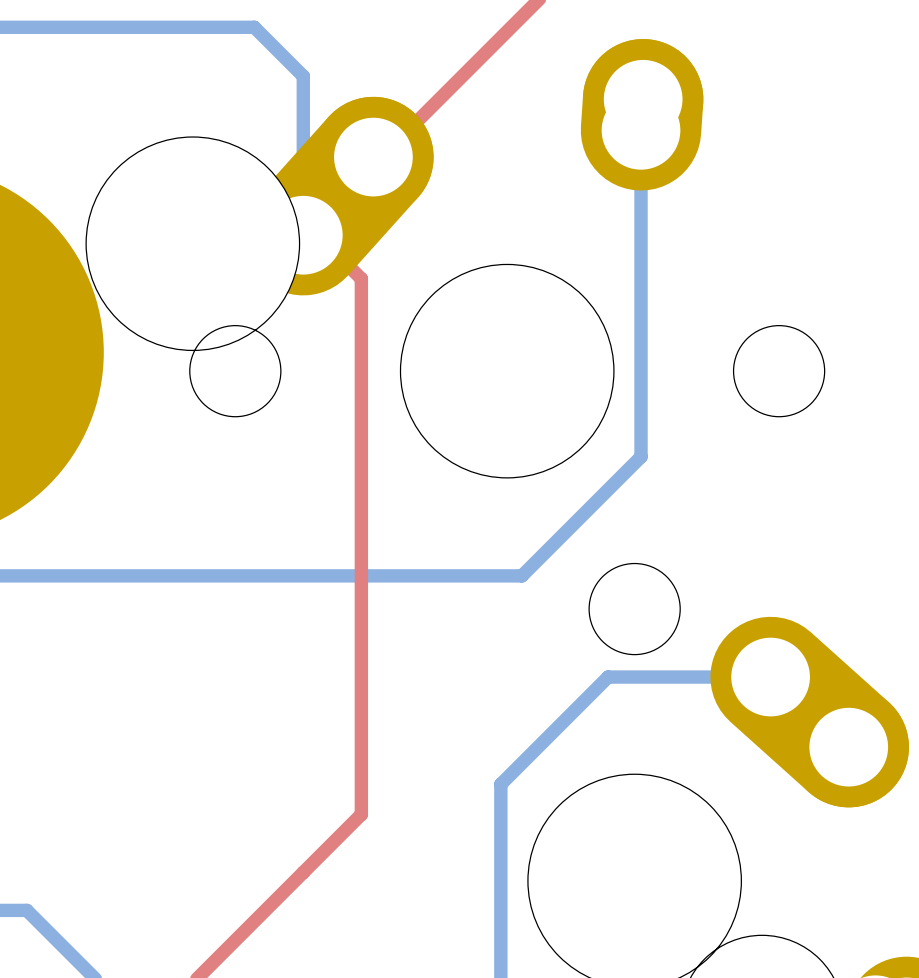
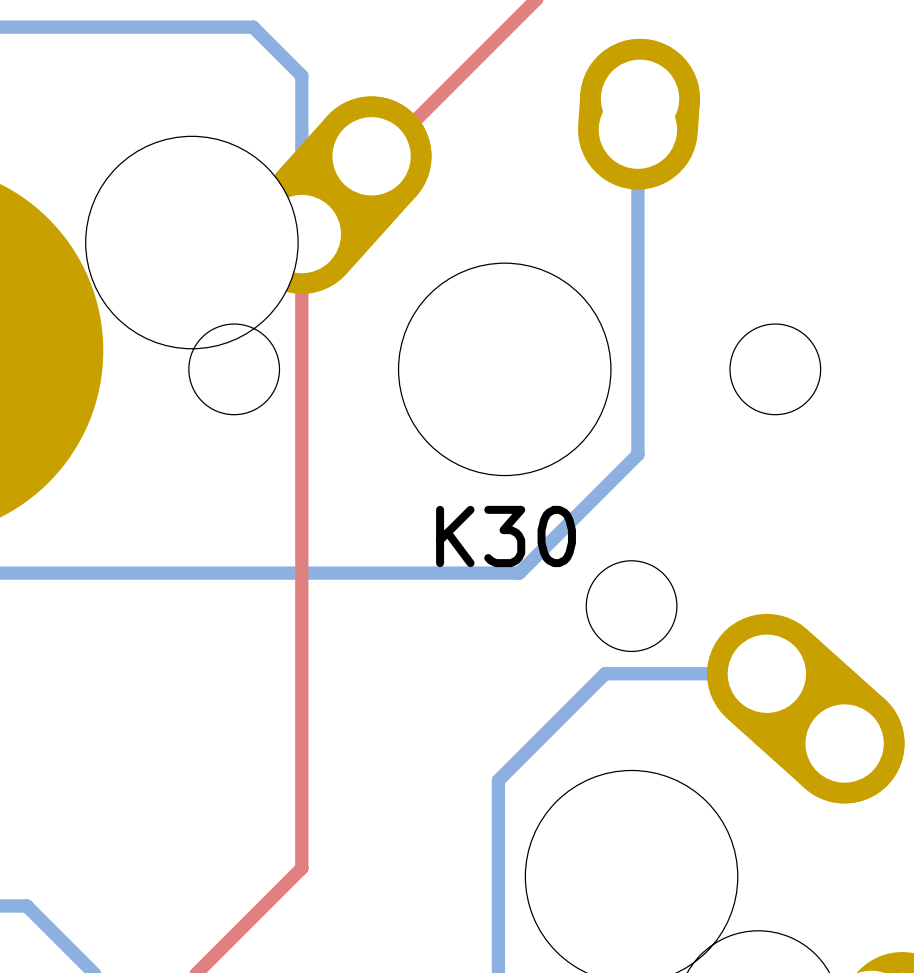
top track: (303, 235) (317, 235) (361, 278) (361, 814) (303, 872) -> (301, 234) (301, 868)
K30 name: none -> K30 (506, 536)

